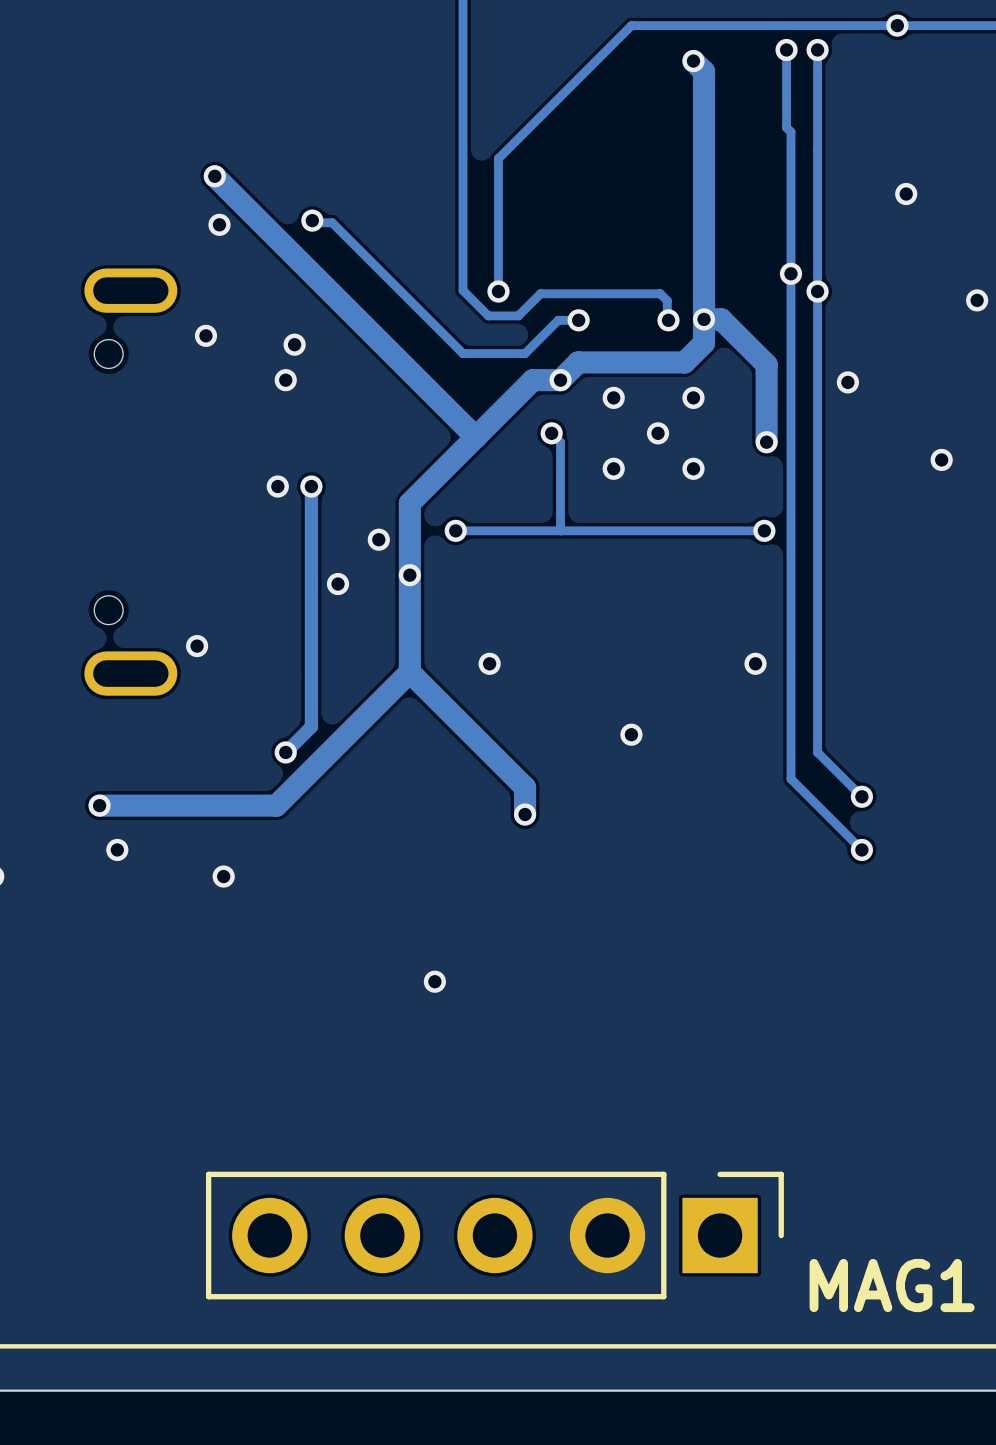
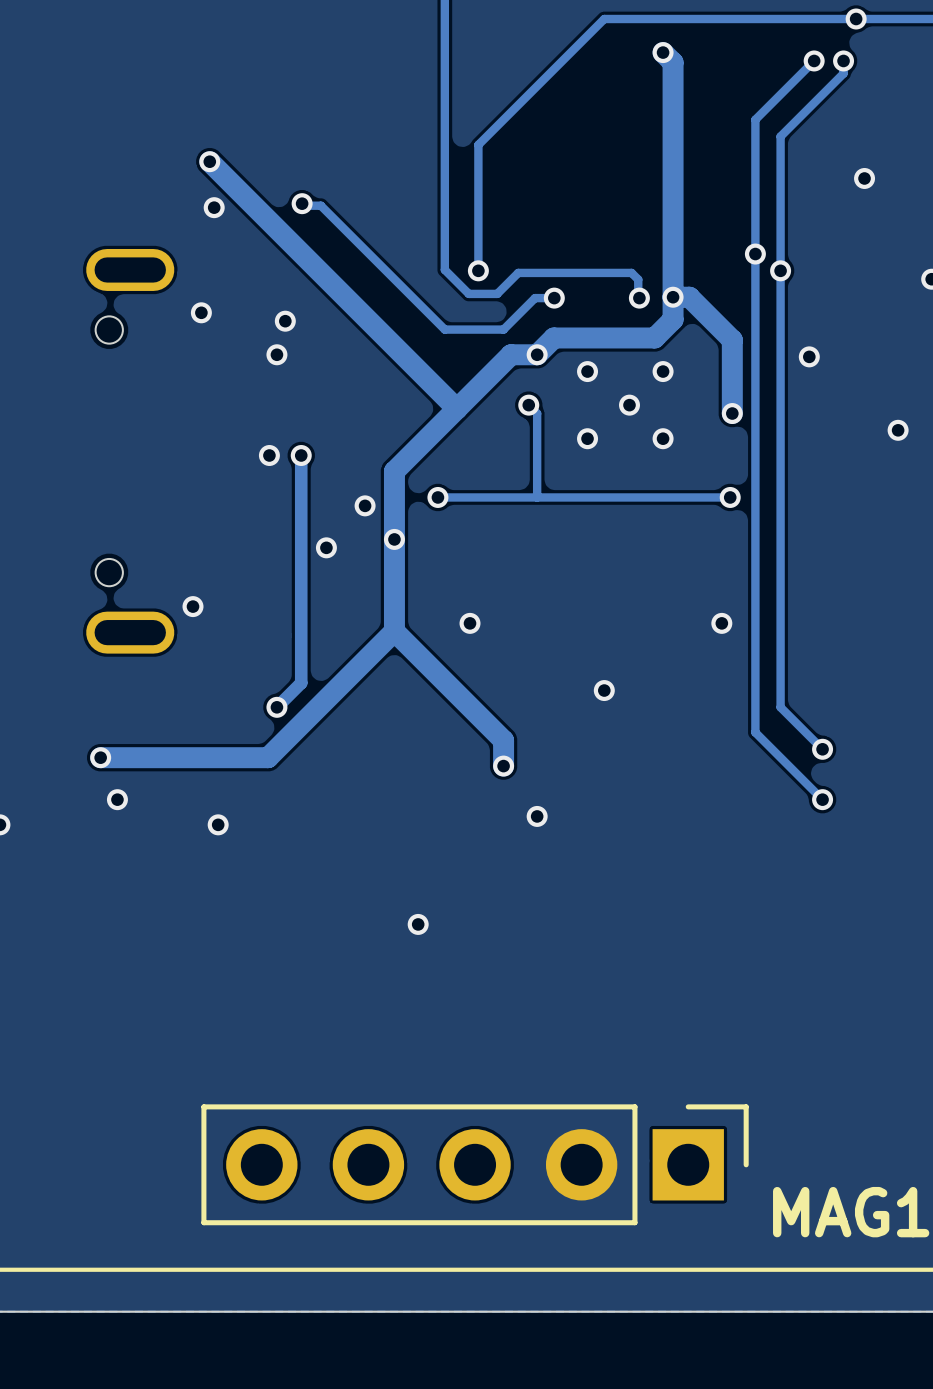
track: (786, 49) (786, 127) (790, 131) -> (814, 60) (755, 119)
via: (786, 49) -> none
track: (817, 49) (817, 149) -> (843, 60) (843, 73) (780, 136)
via: (817, 49) -> none
via: none -> (814, 60)
via: none -> (843, 60)
via: none -> (537, 816)

